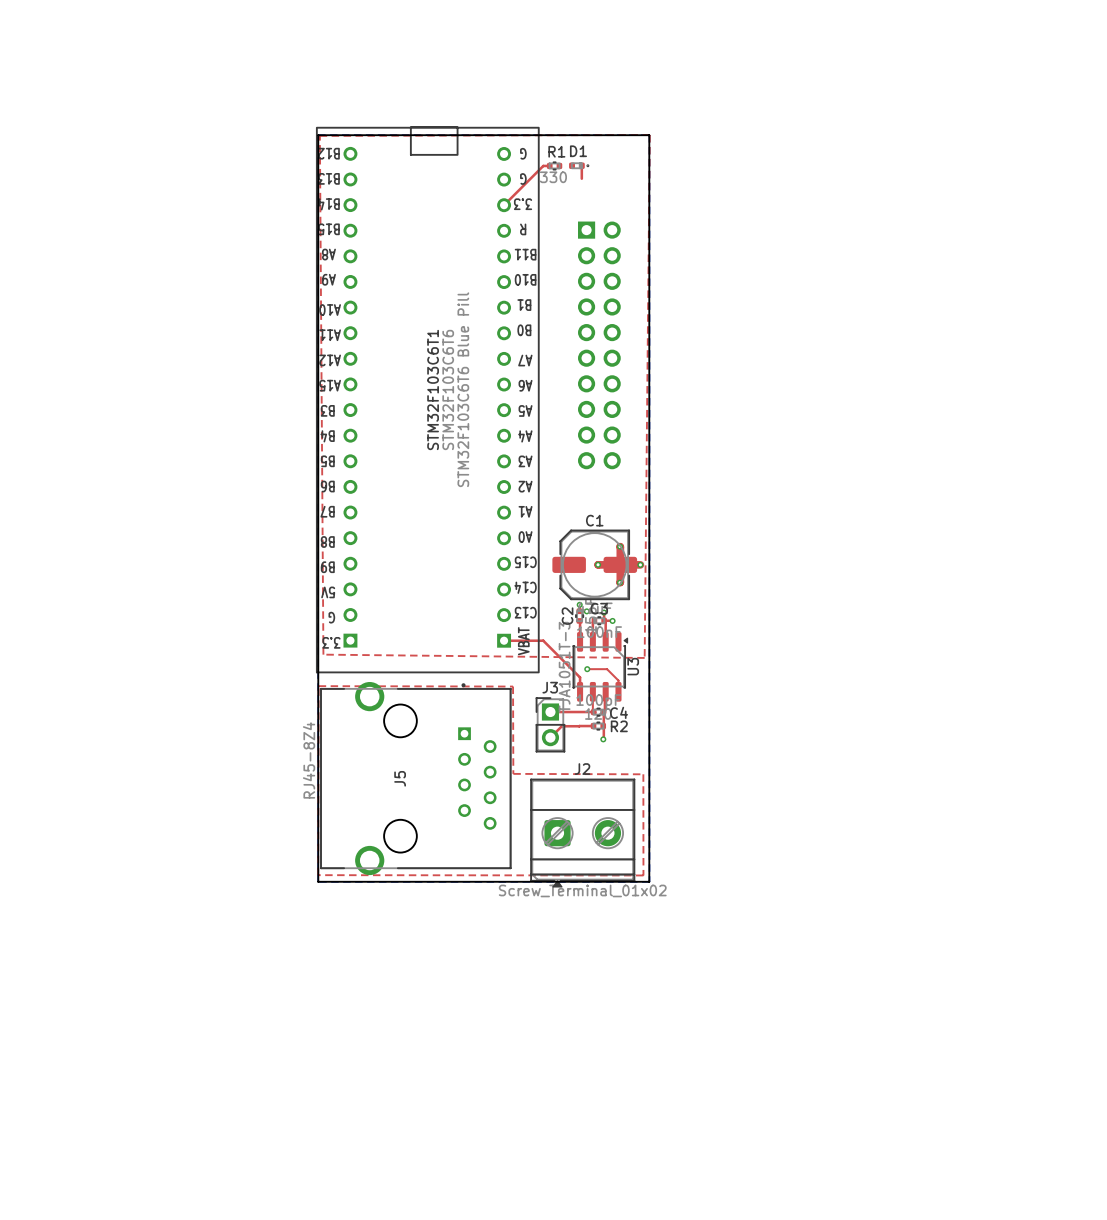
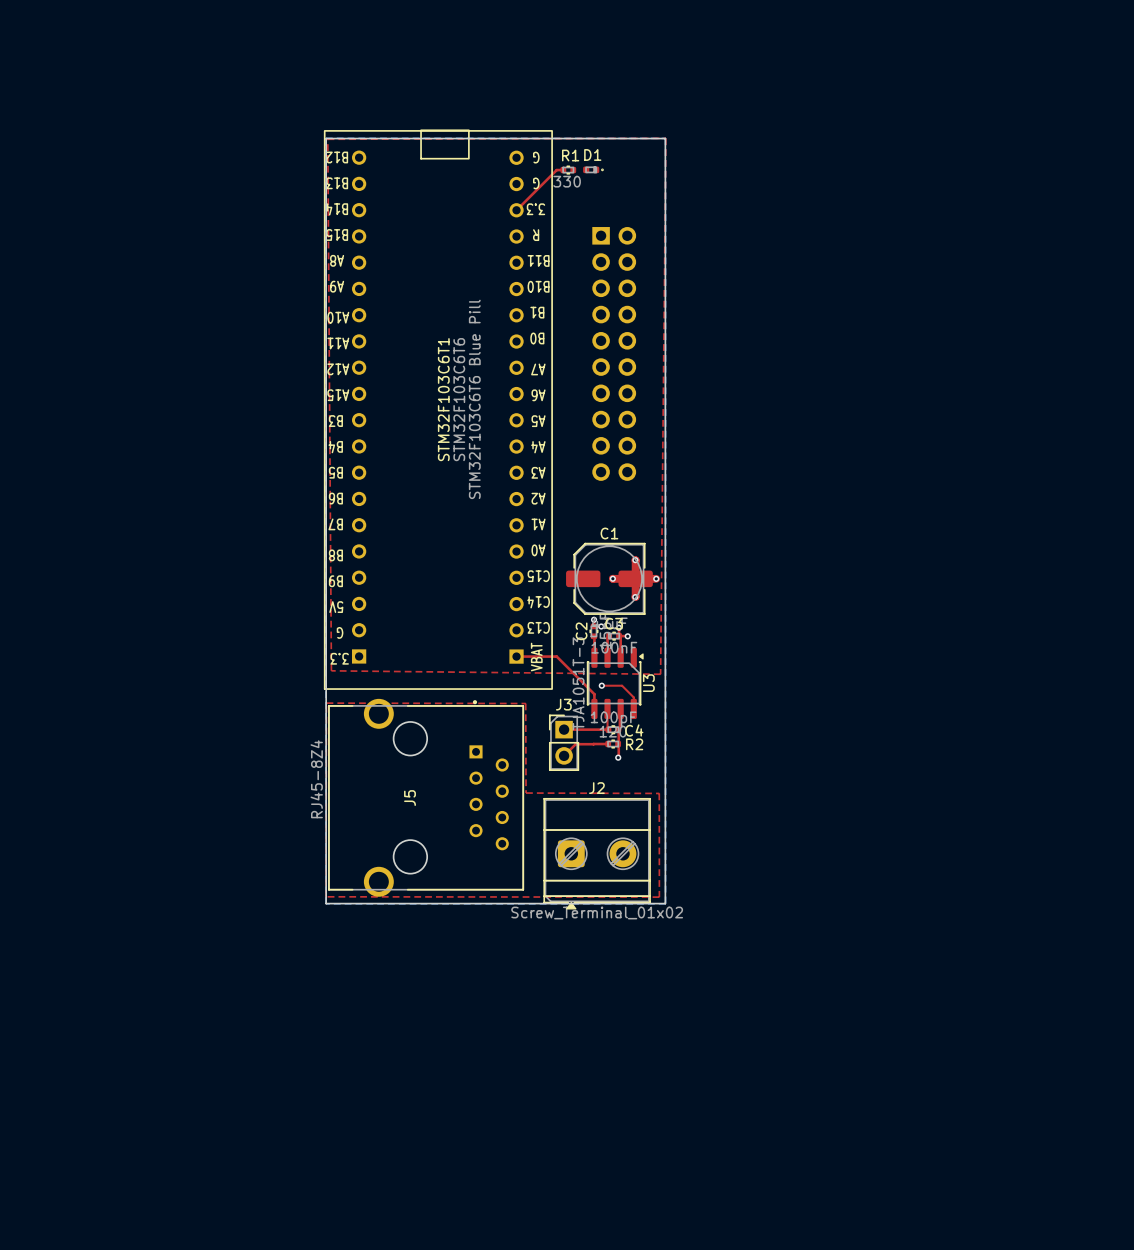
top track: (581, 165) (581, 178) -> none

